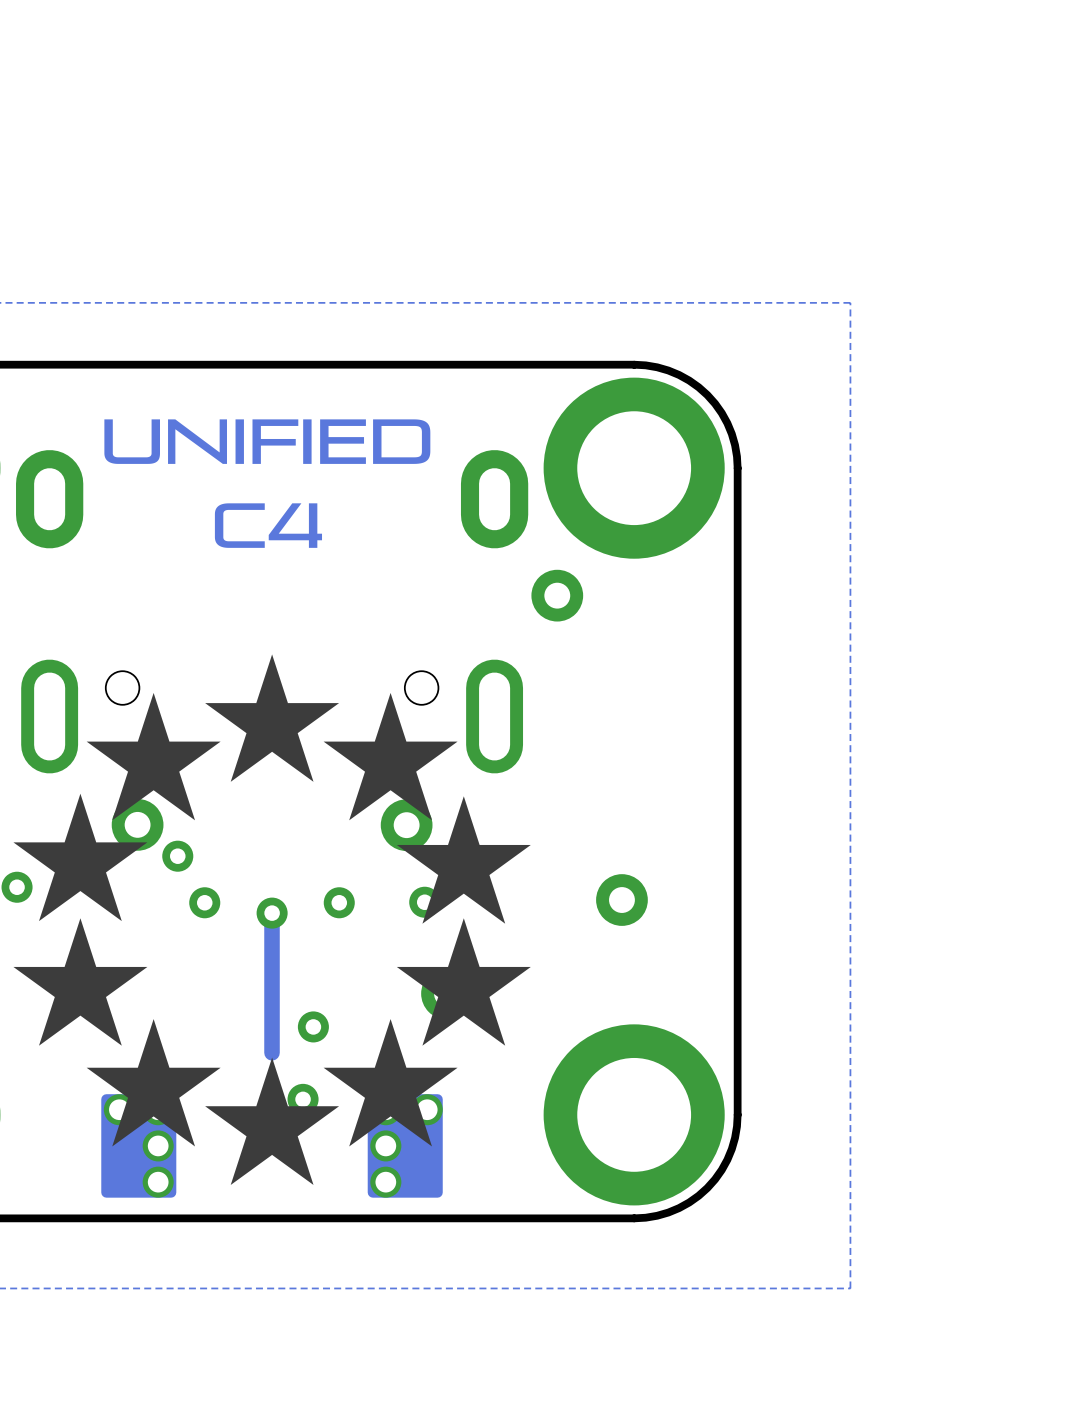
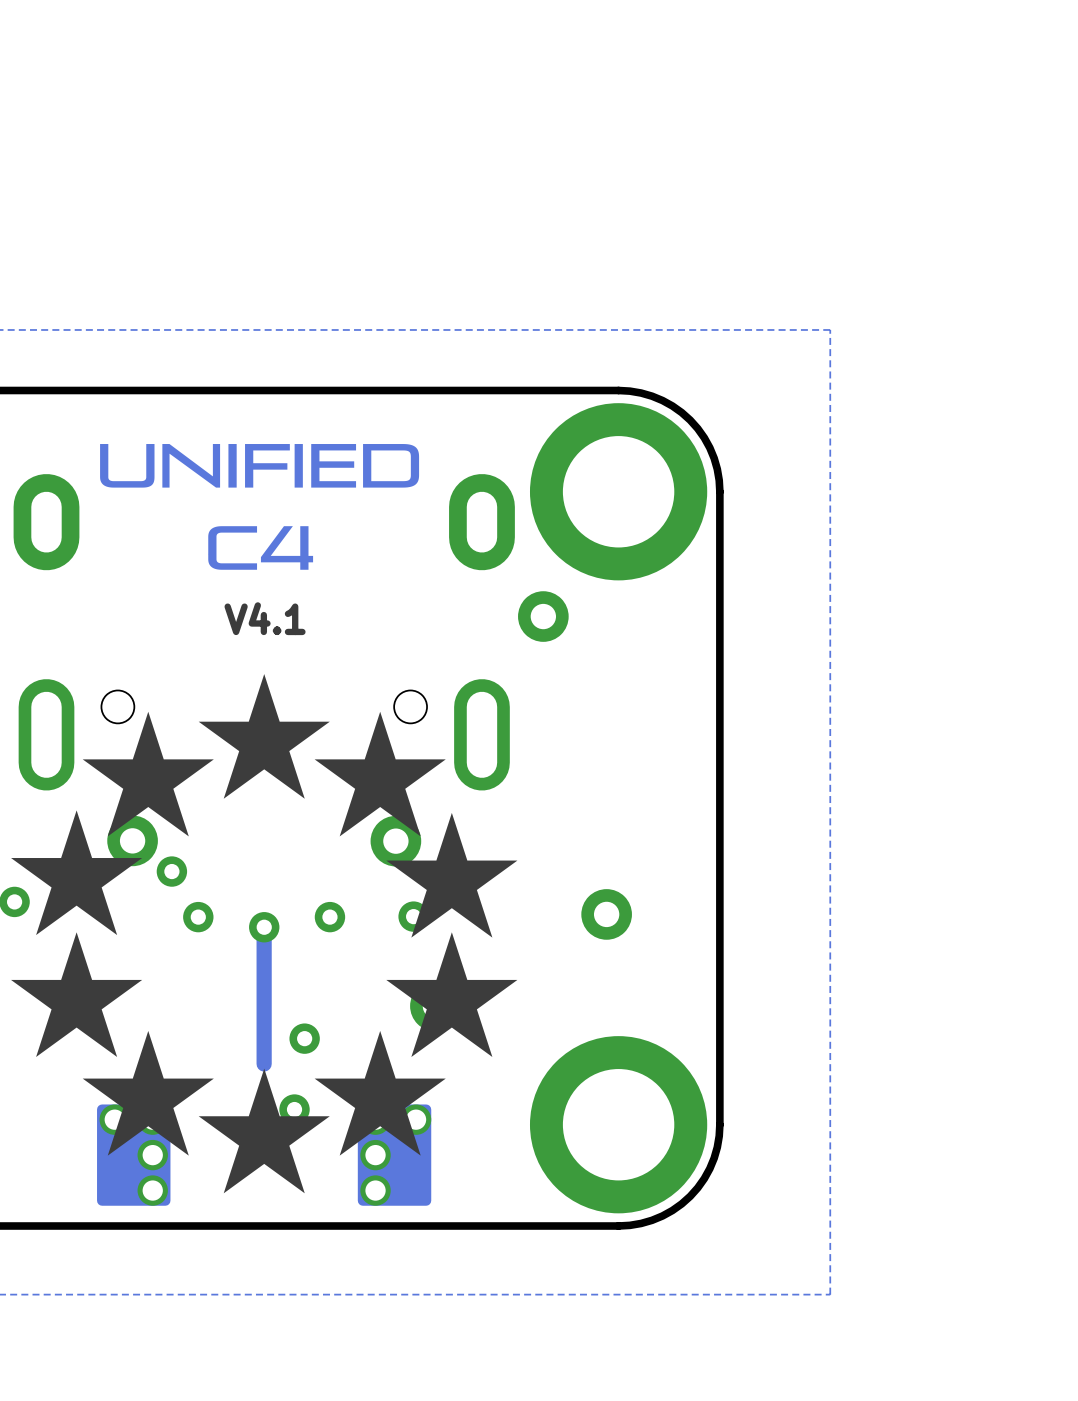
text: none -> V4.1 (265, 618)

